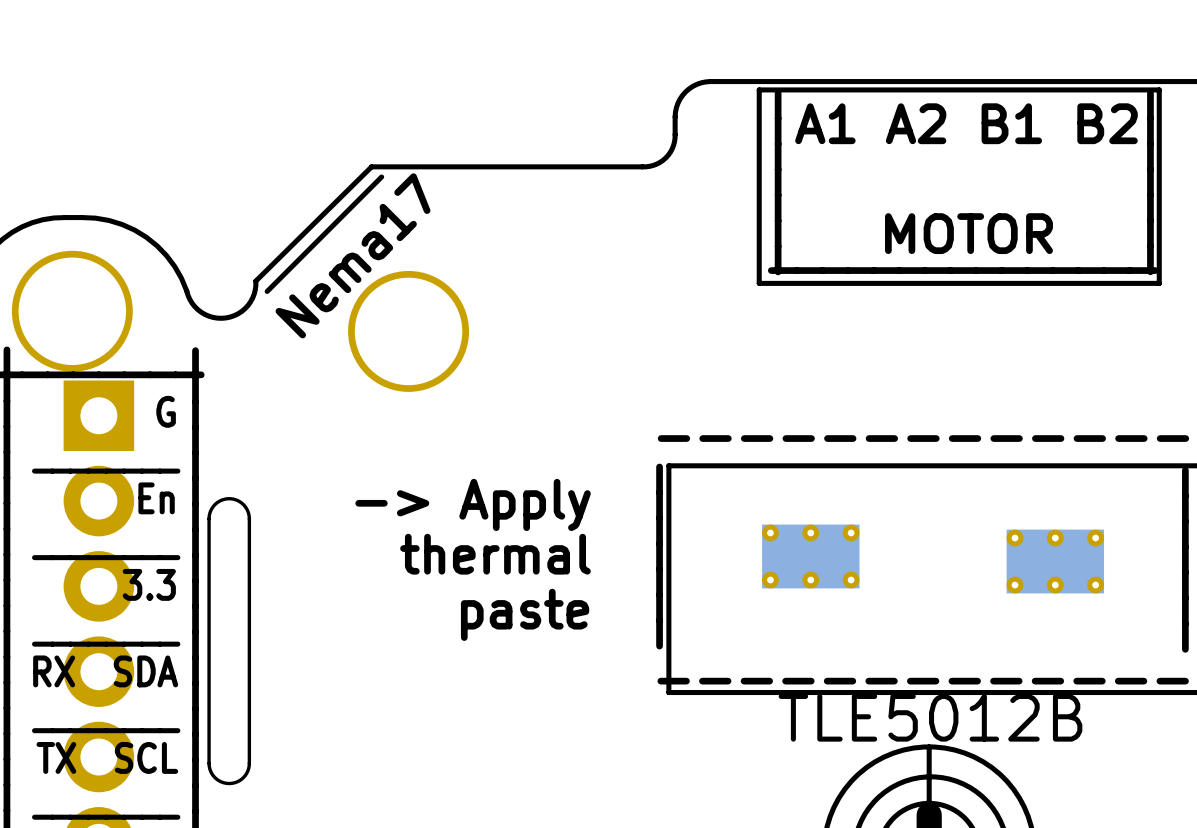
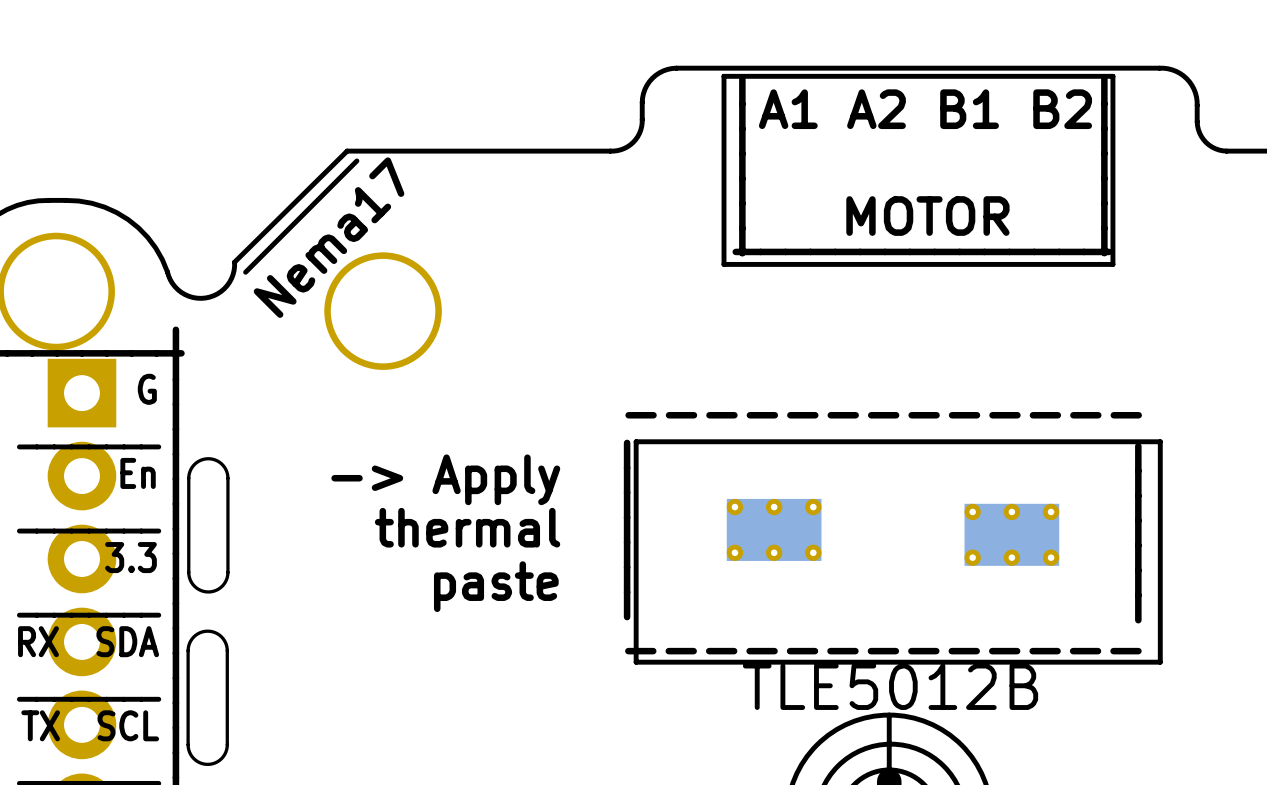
board edge: none -> (227, 478) (227, 577) (218, 589) (203, 591) (194, 586) (188, 574) (189, 473) (197, 462) (210, 458) (223, 465) (227, 478)
board edge: (249, 518) (249, 766) (246, 773) (241, 779) (234, 782) (226, 783) (219, 780) (213, 775) (209, 763) (209, 516) (215, 503) (222, 500) (231, 498) (244, 505) (249, 518) -> none
board edge: none -> (227, 650) (226, 749) (217, 761) (202, 763) (193, 758) (188, 747) (188, 645) (195, 635) (210, 631) (221, 636) (227, 650)

